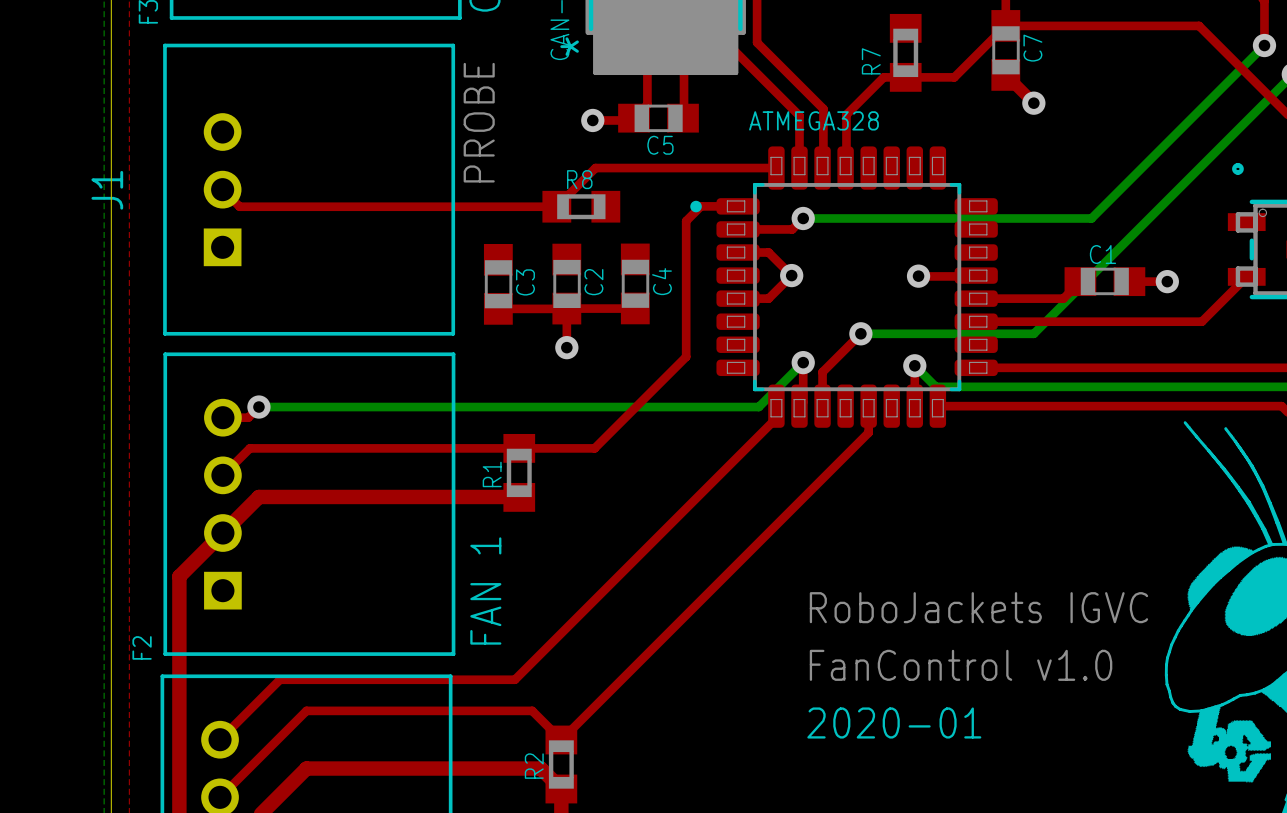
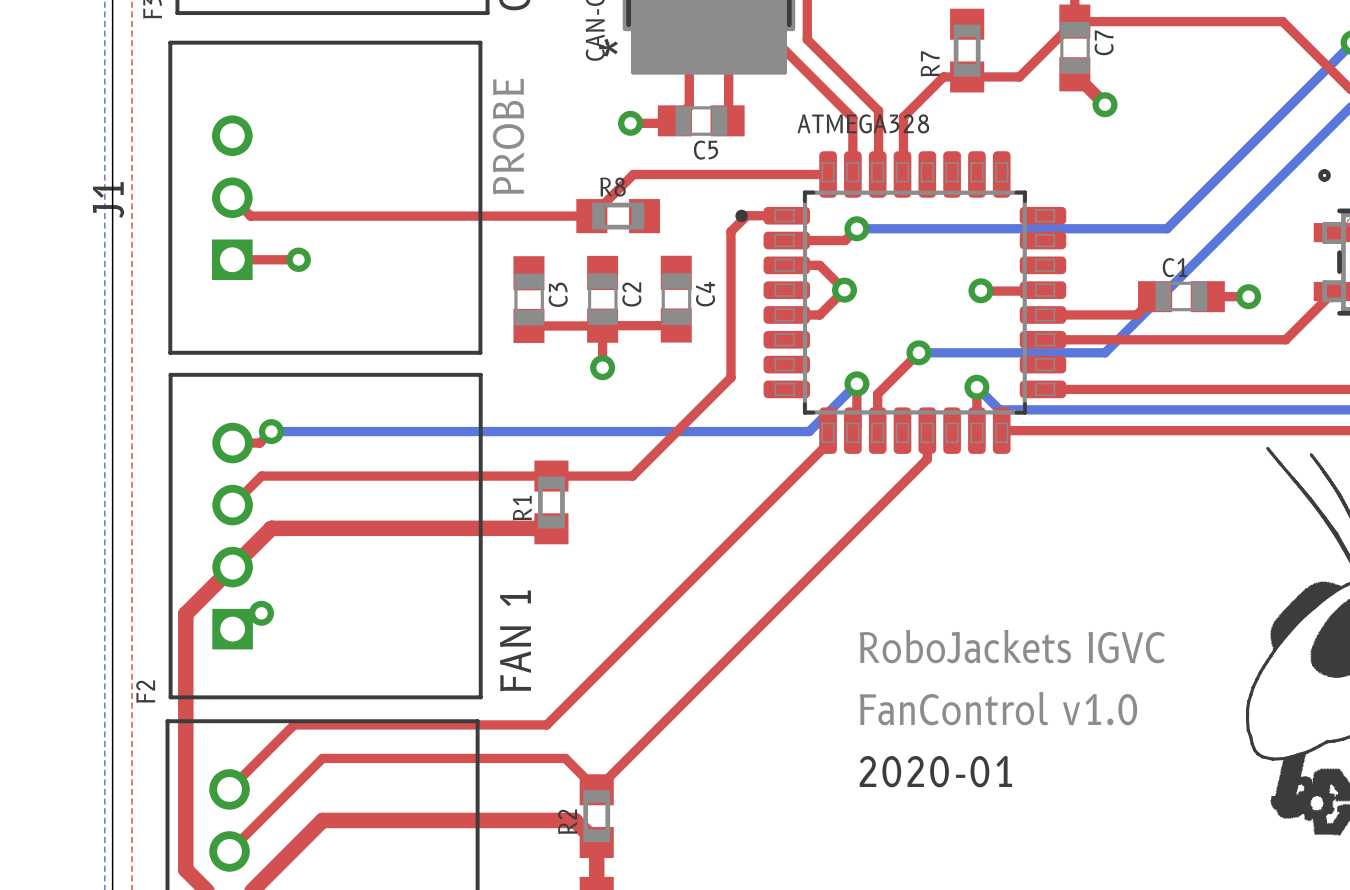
top track: none -> (232, 259) (298, 259)
via: none -> (298, 259)
via: none -> (261, 613)

